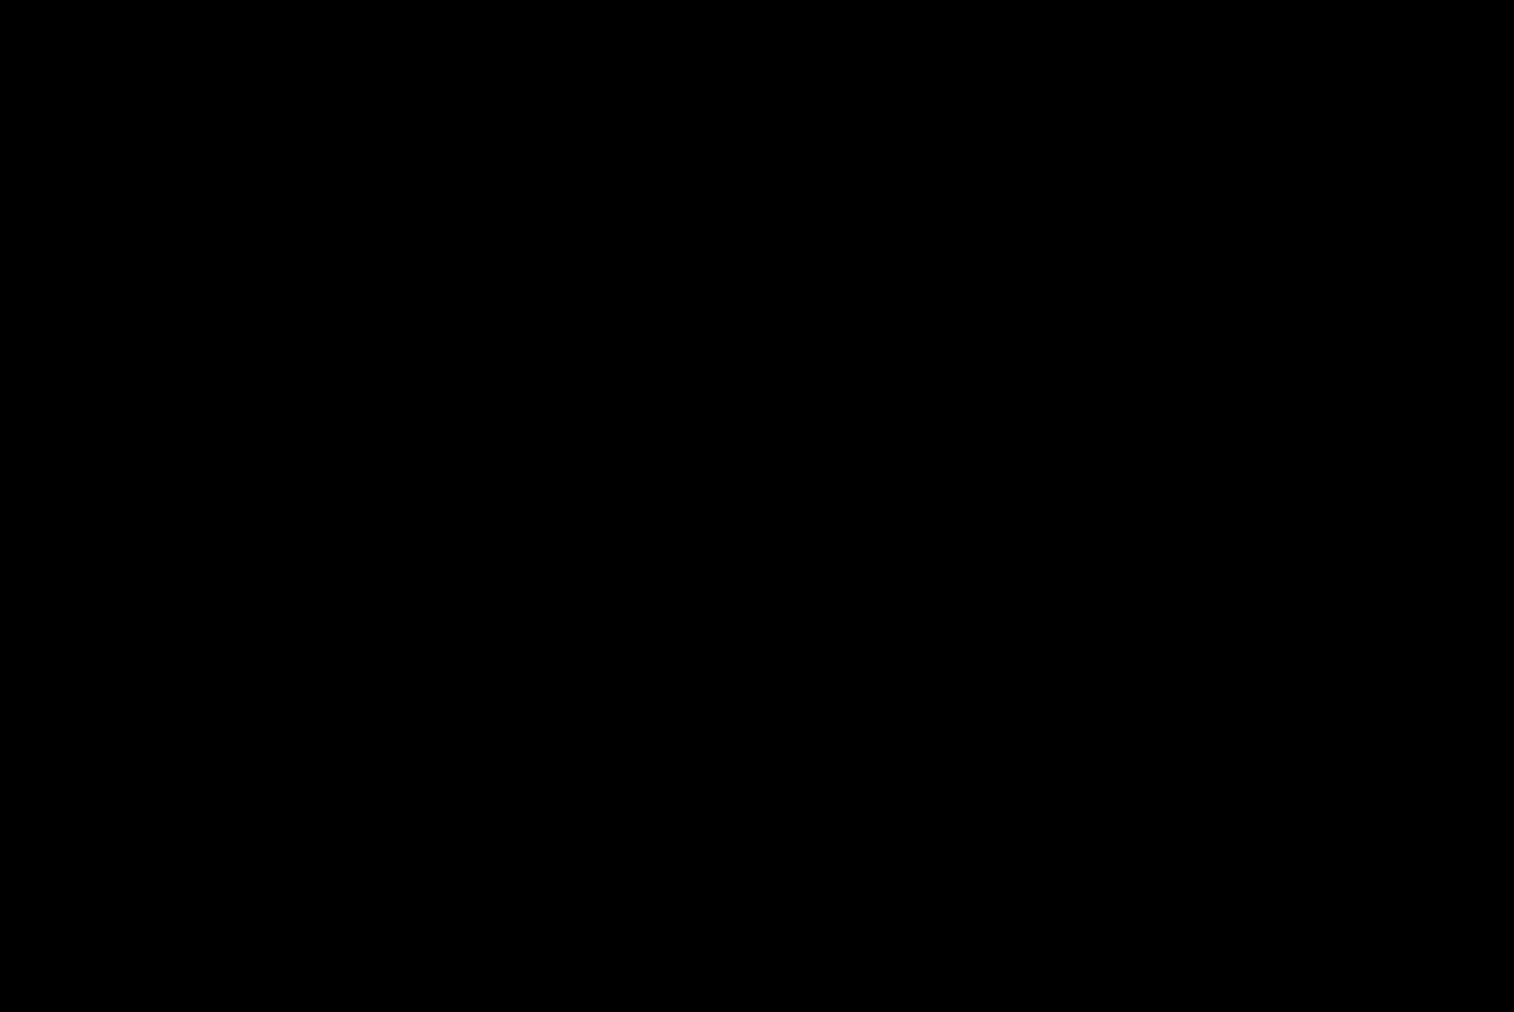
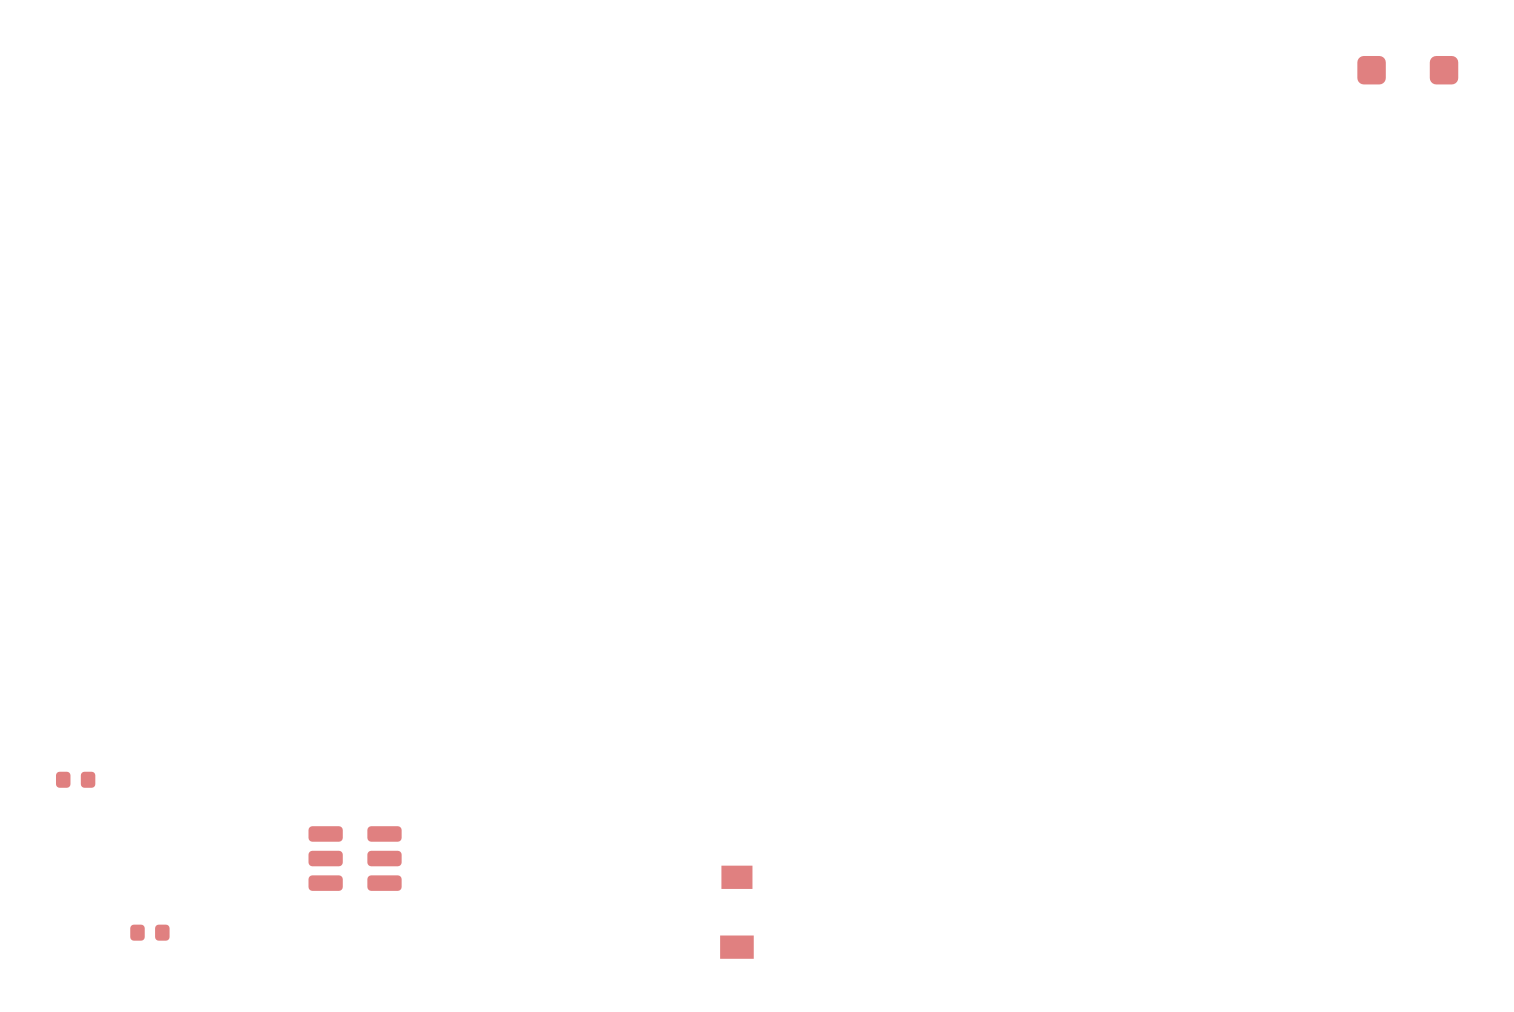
part: none -> (1407, 70)
part: none -> (75, 779)
part: none -> (355, 858)
part: none -> (736, 912)
part: none -> (149, 932)

